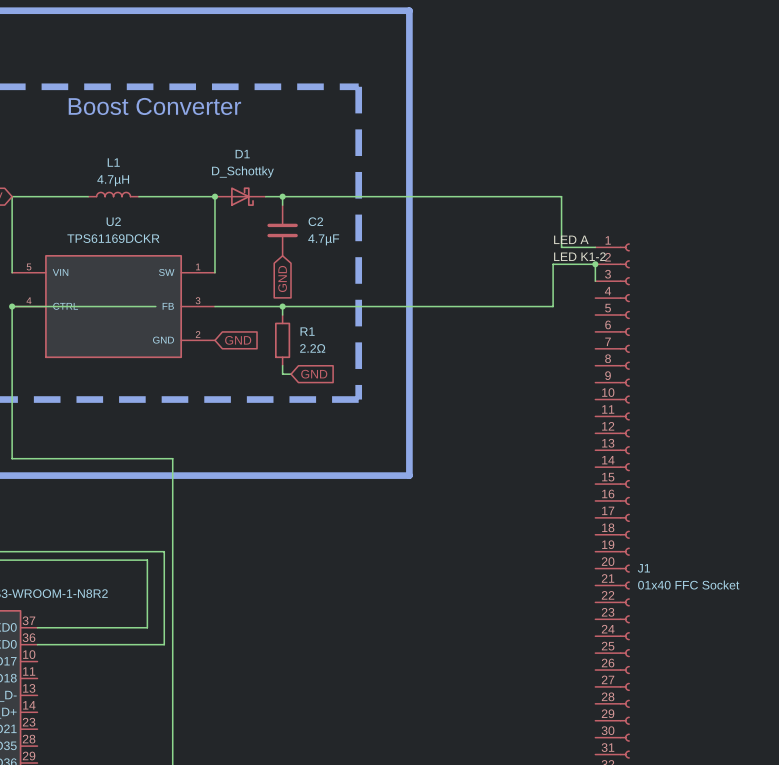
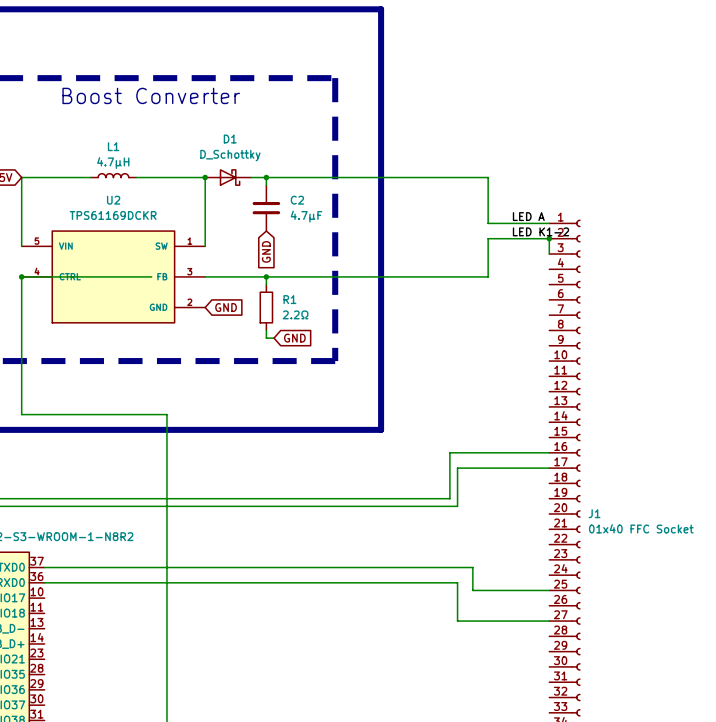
wire: (527, 196) (561, 196) (561, 247) -> (488, 177) (488, 223) (518, 223)
wire: (553, 264) (553, 306) (527, 306) -> (511, 238) (488, 238) (488, 276)
wire: none -> (549, 452) (449, 452) (449, 498) (159, 498)
wire: none -> (549, 468) (457, 468) (457, 506) (144, 506)
wire: (164, 551) (164, 644) -> (549, 621) (457, 621) (457, 582) (159, 582)
wire: (147, 560) (147, 627) -> (549, 590) (472, 590) (472, 567) (144, 567)

